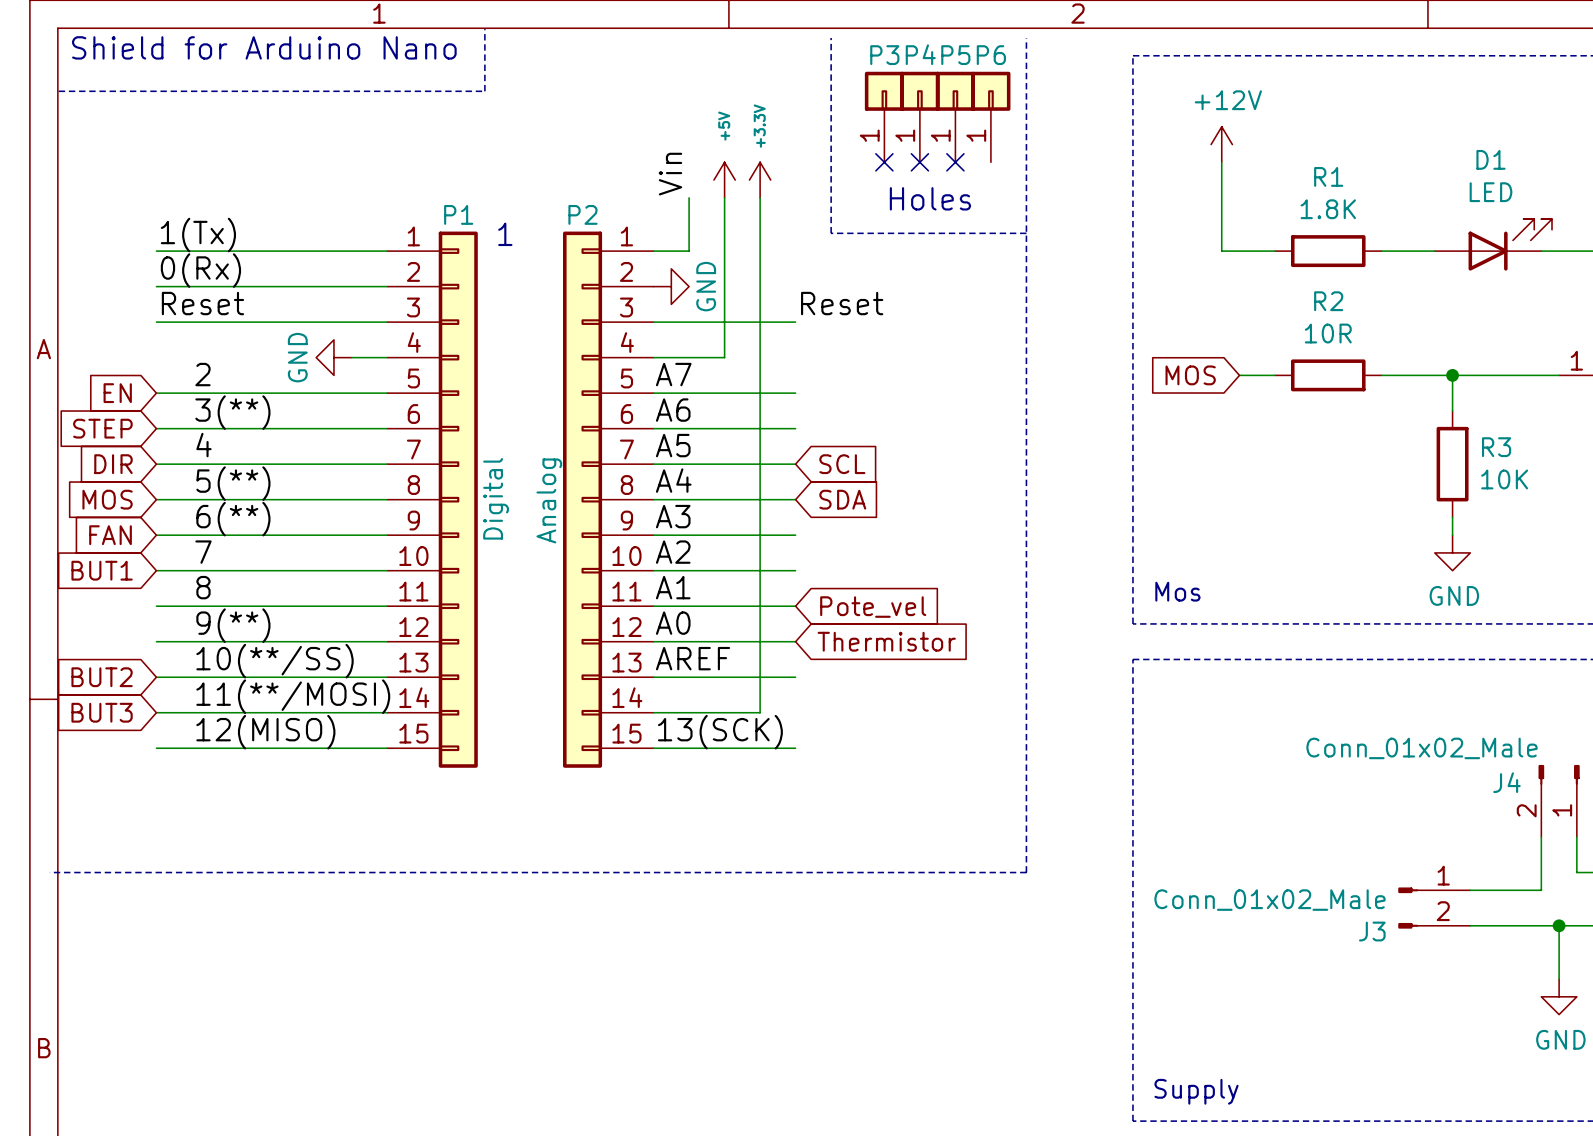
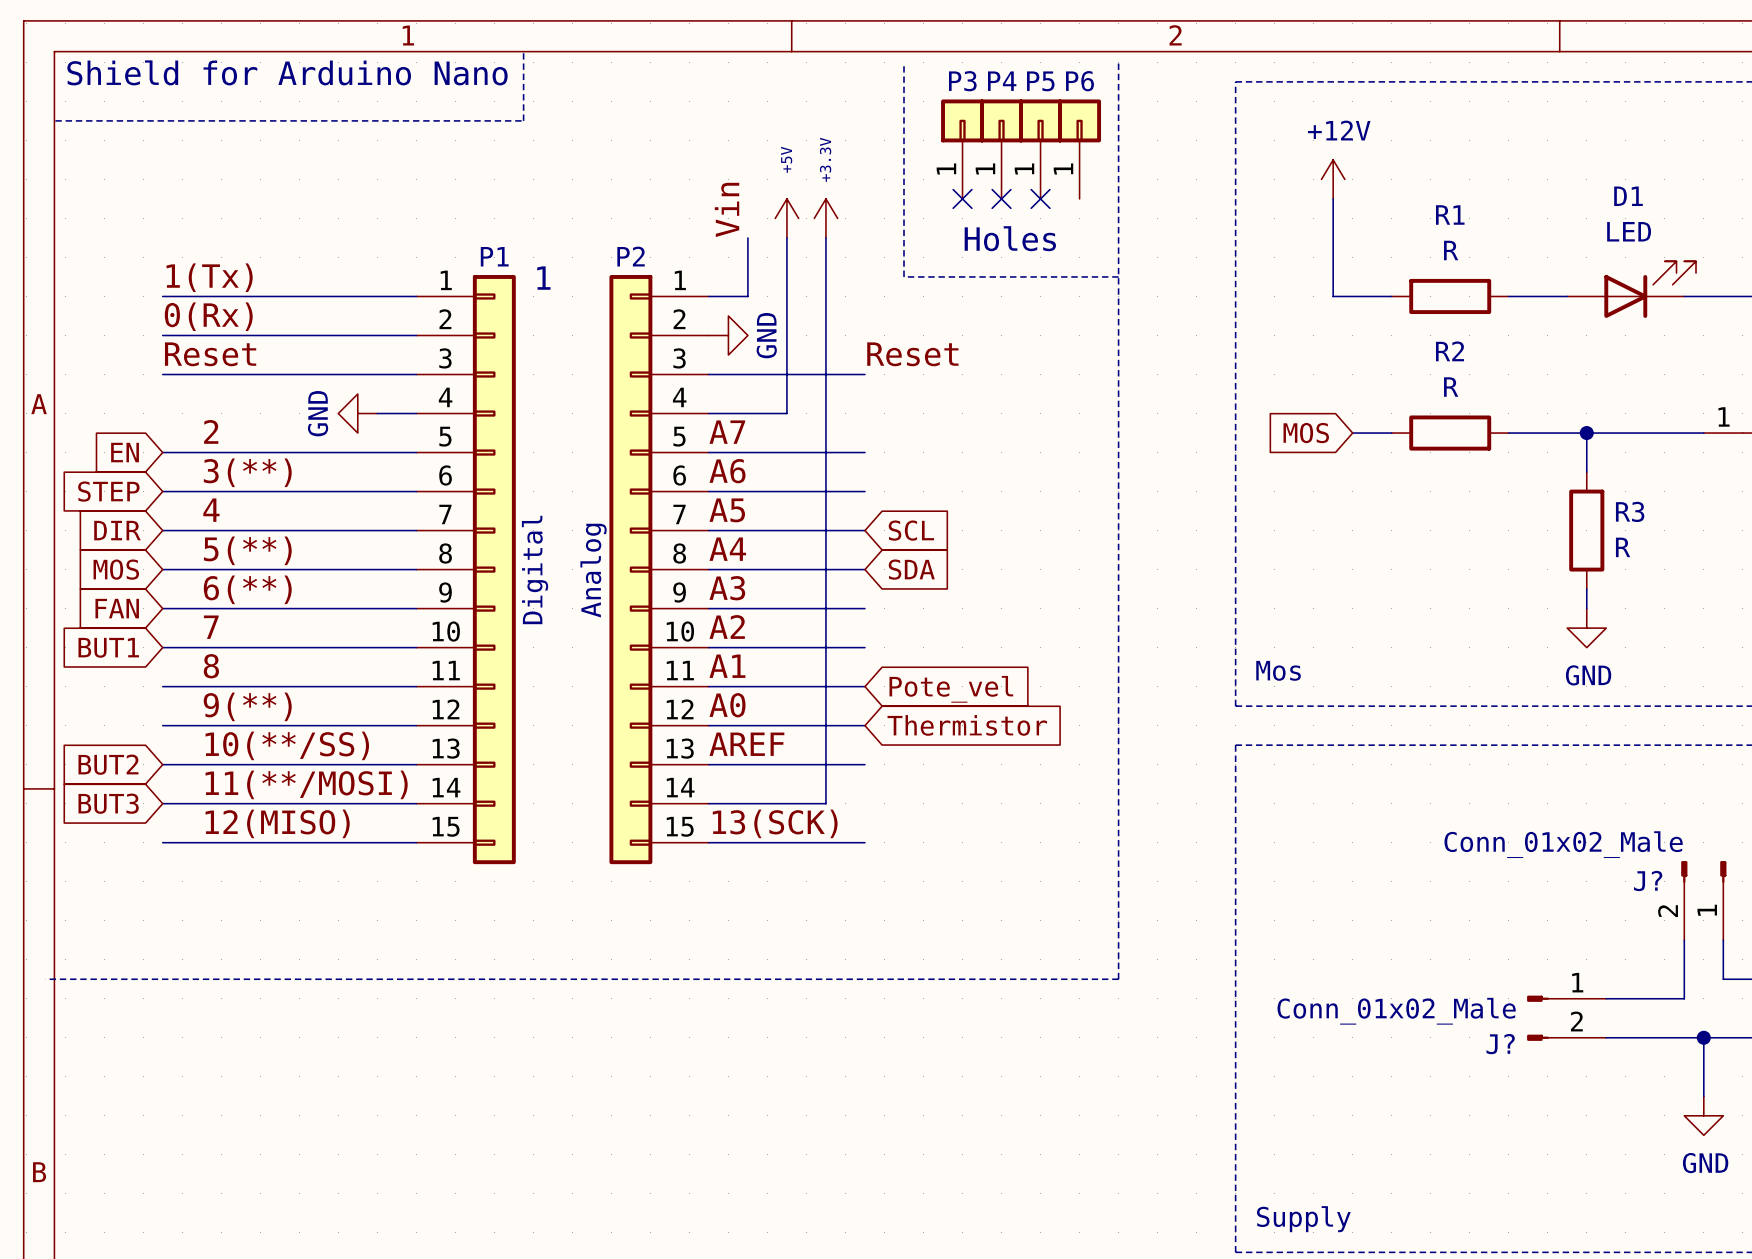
R1 value: 1.8K (1328, 209) -> R (1451, 250)
R2 value: 10R (1328, 333) -> R (1451, 387)
R3 value: 10K (1504, 479) -> R (1623, 547)
J4 name: J4 (1506, 782) -> J? (1648, 880)
J3 name: J3 (1372, 931) -> J? (1500, 1044)

